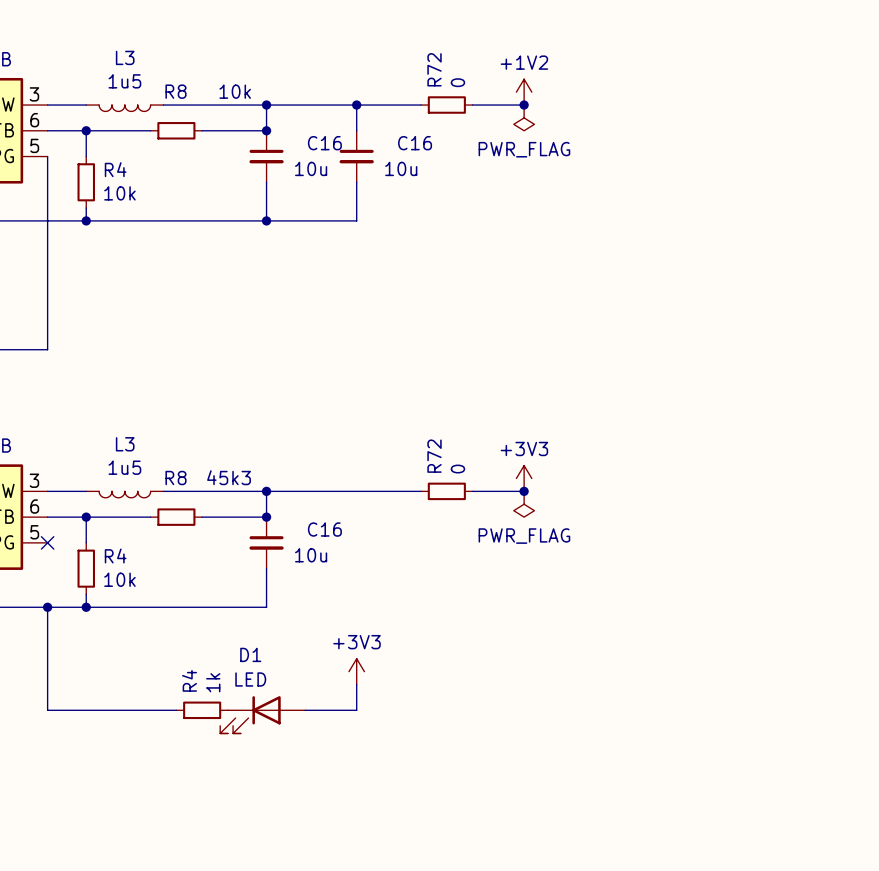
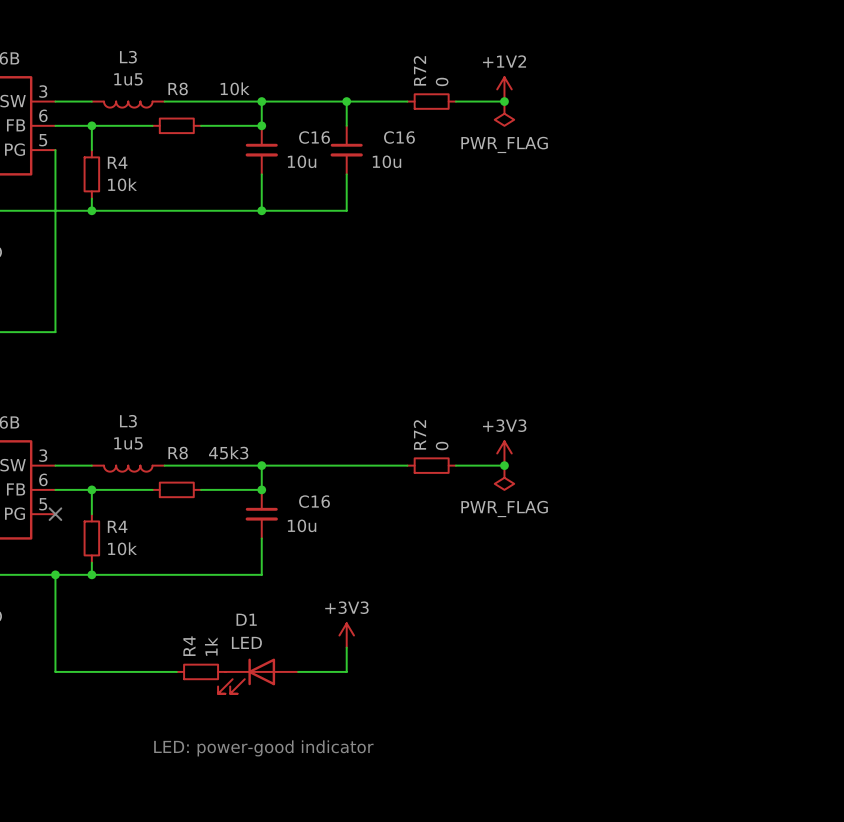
text: none -> LED: power-good indicator (263, 748)

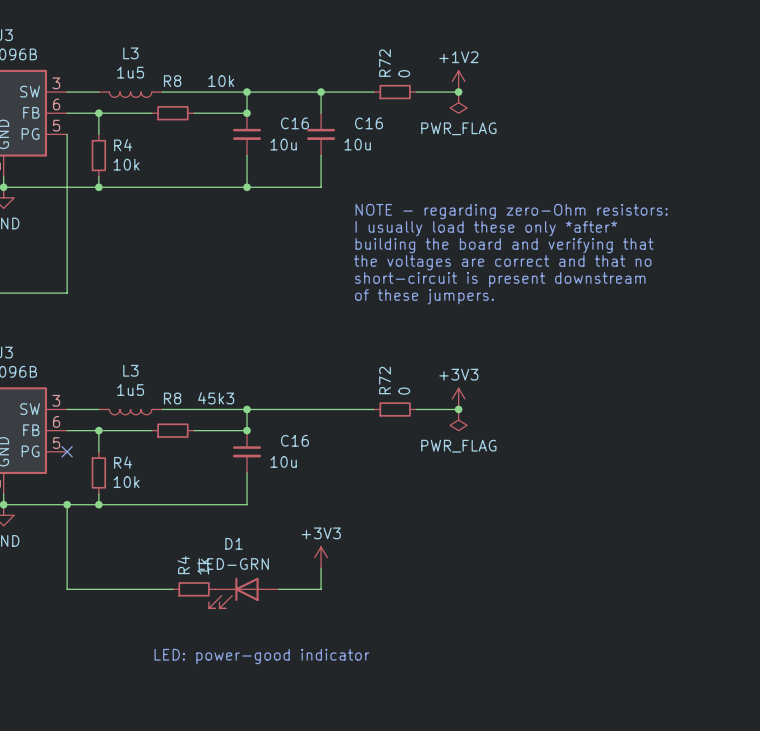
text: none -> NOTE - regarding zero-Ohm resistors: (511, 211)
text: none -> I usually load these only *after* (486, 228)
text: none -> building the board and verifying that (504, 245)
text: none -> the voltages are correct and that no (502, 262)
text: none -> short-circuit is present downstream (500, 279)
text: none -> of these jumpers. (424, 296)
D1 value: LED (246, 642) -> LED-GRN (233, 564)

